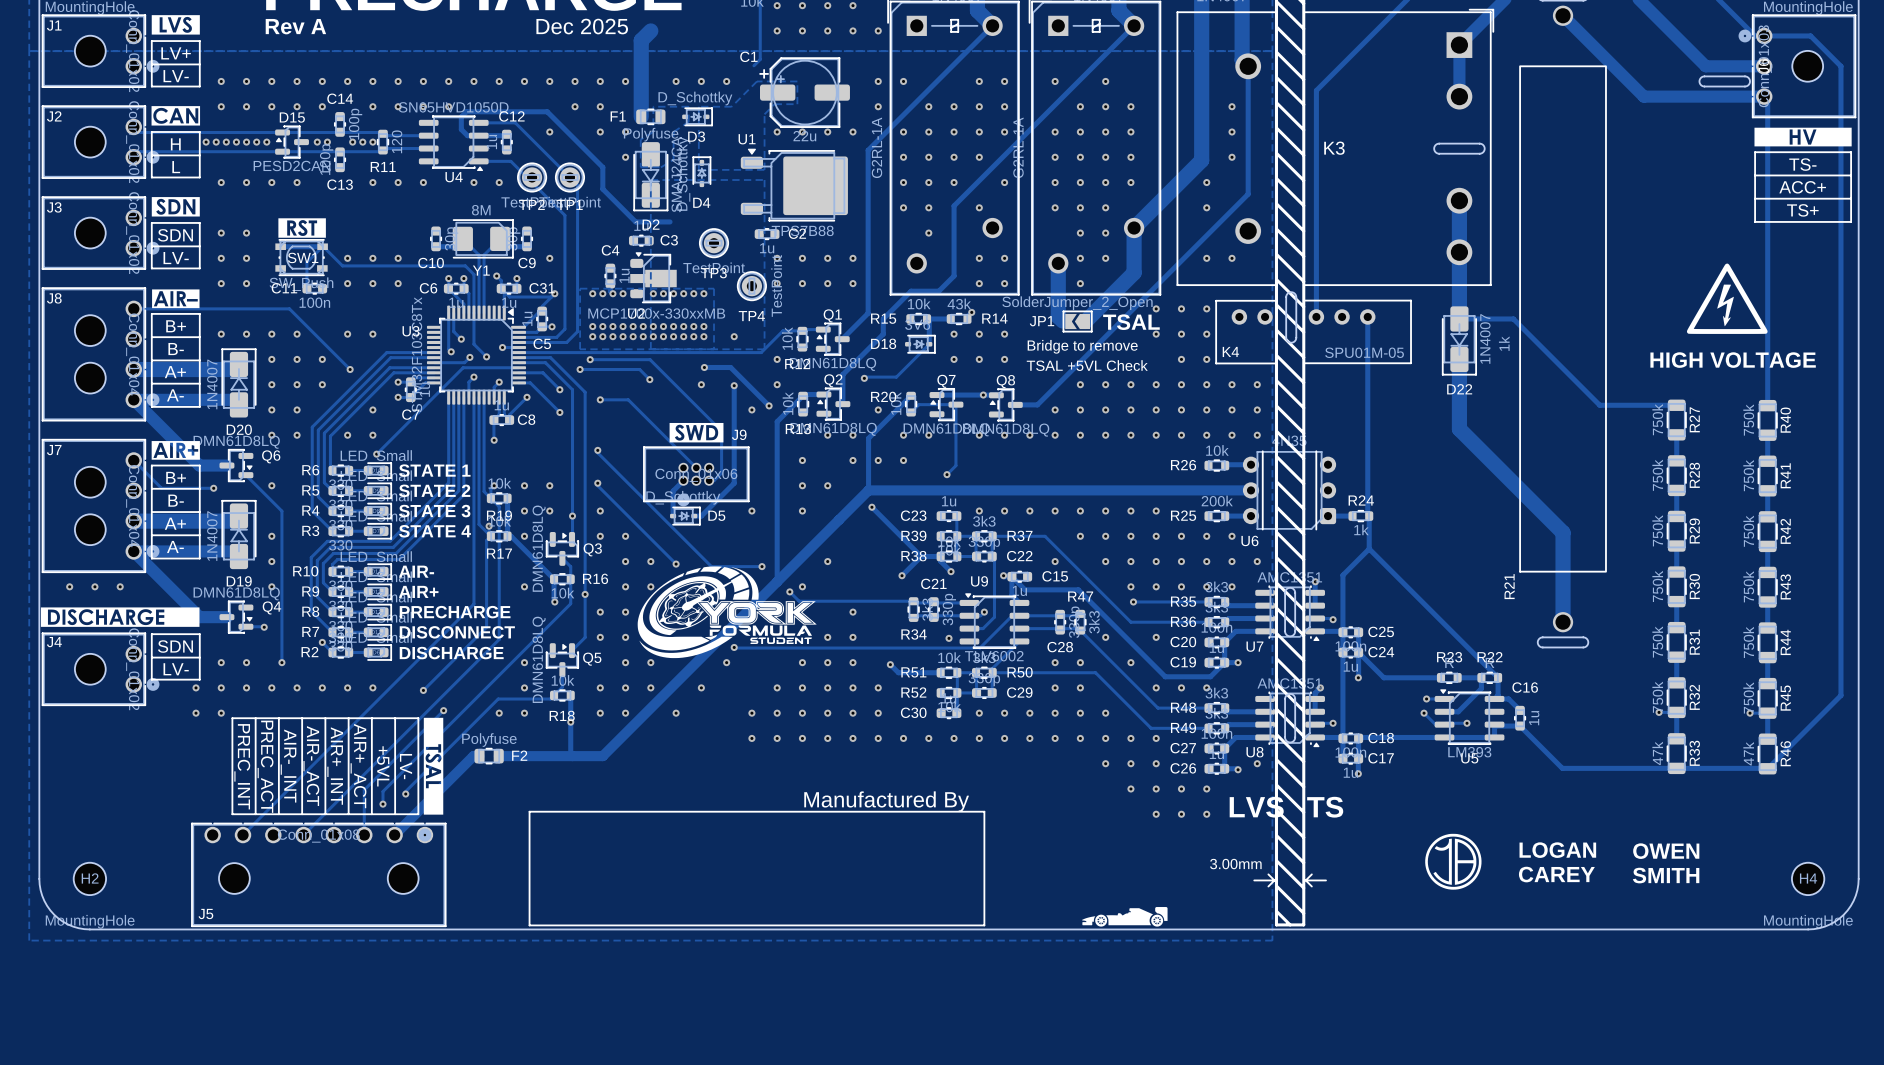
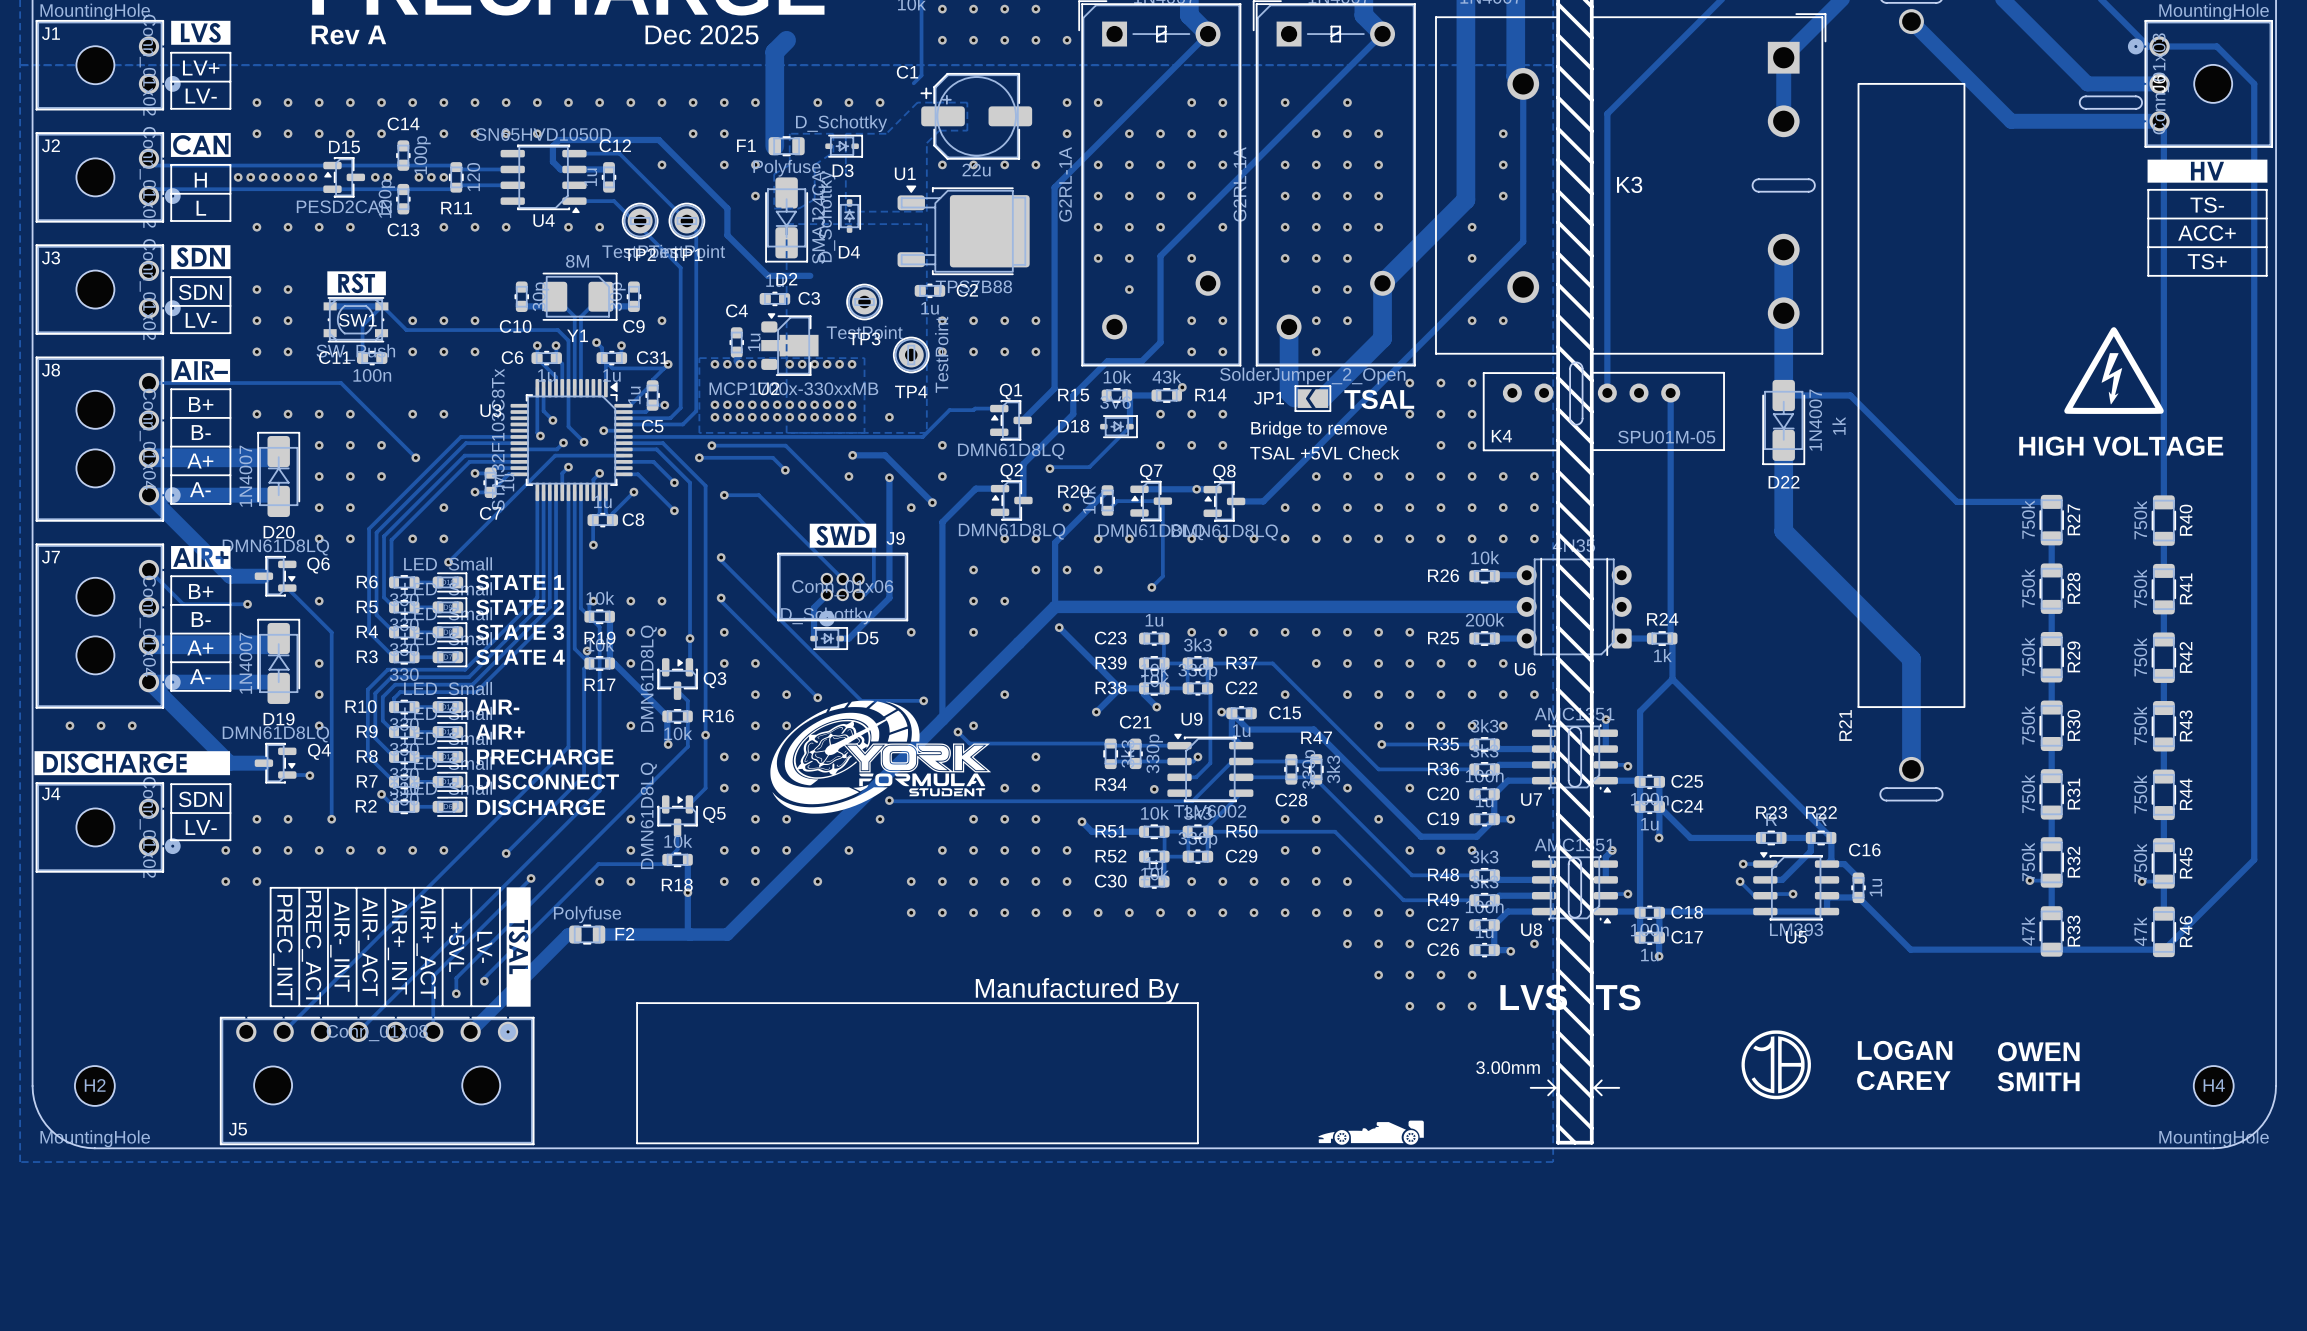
R12: 10k (802, 339) -> none
R13: 10k (803, 404) -> none

